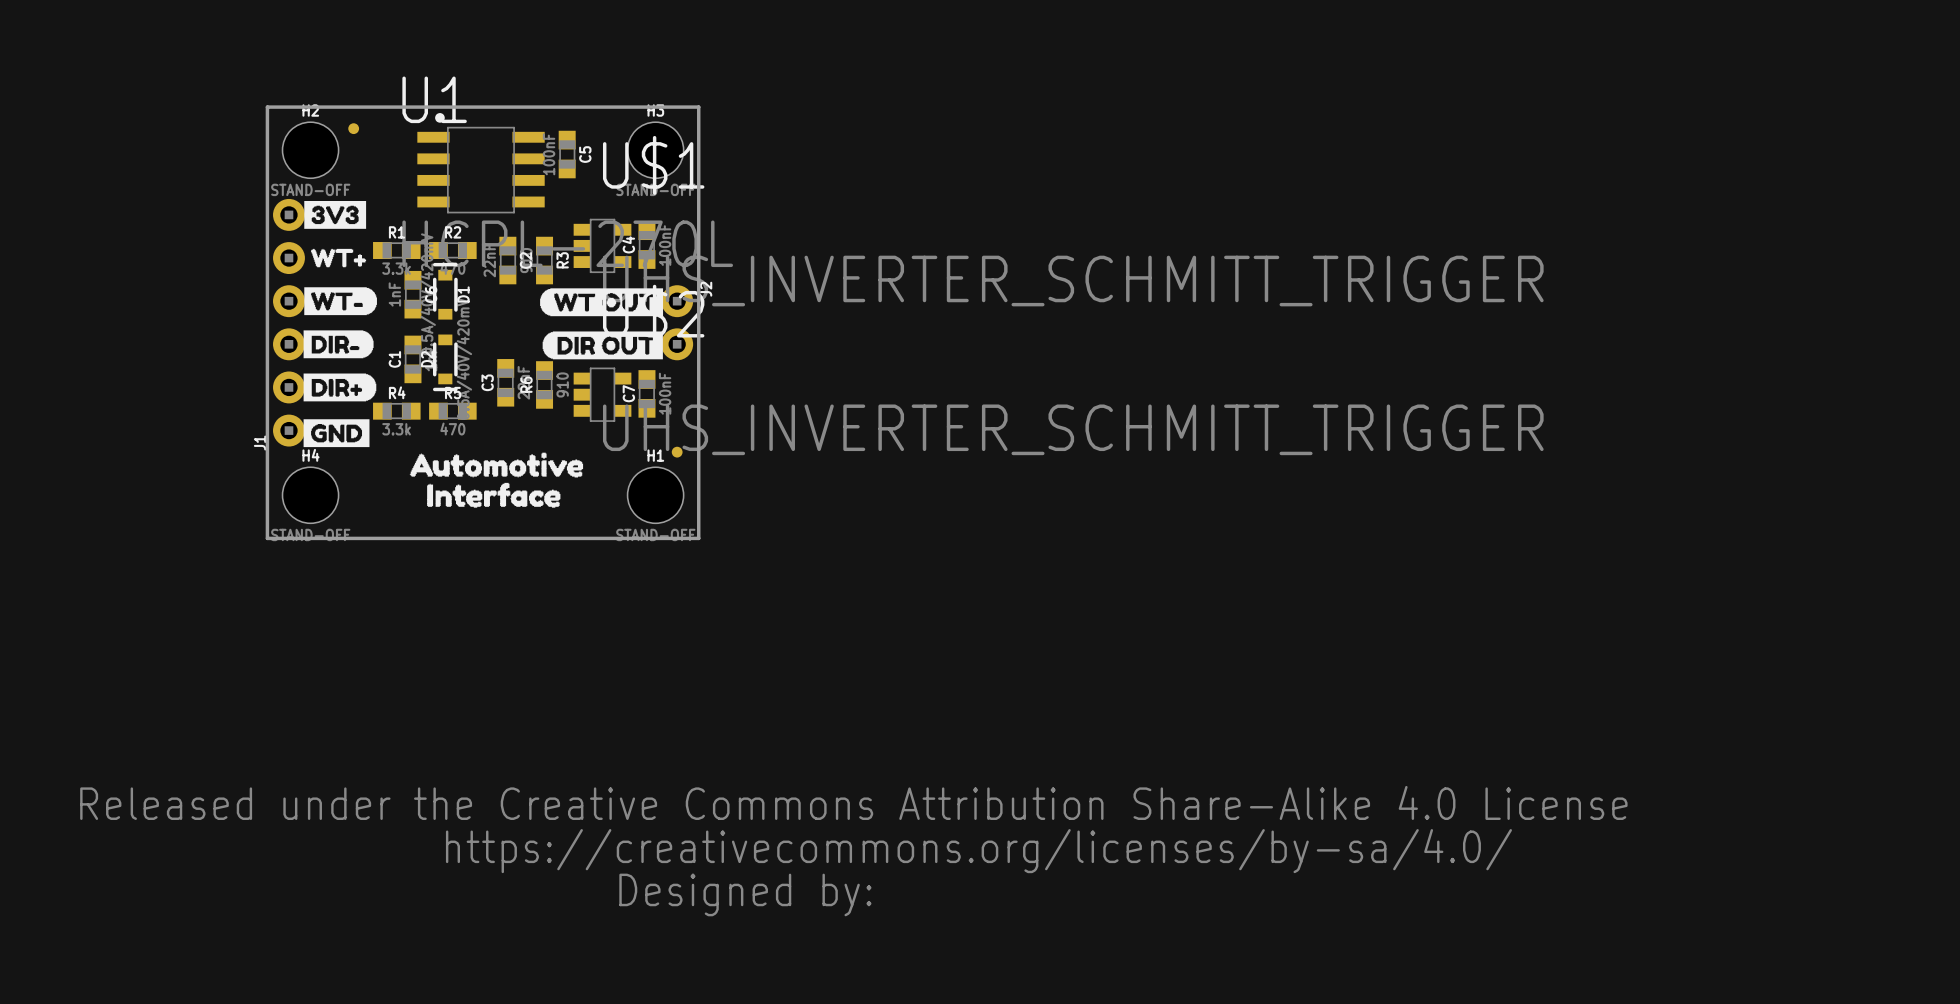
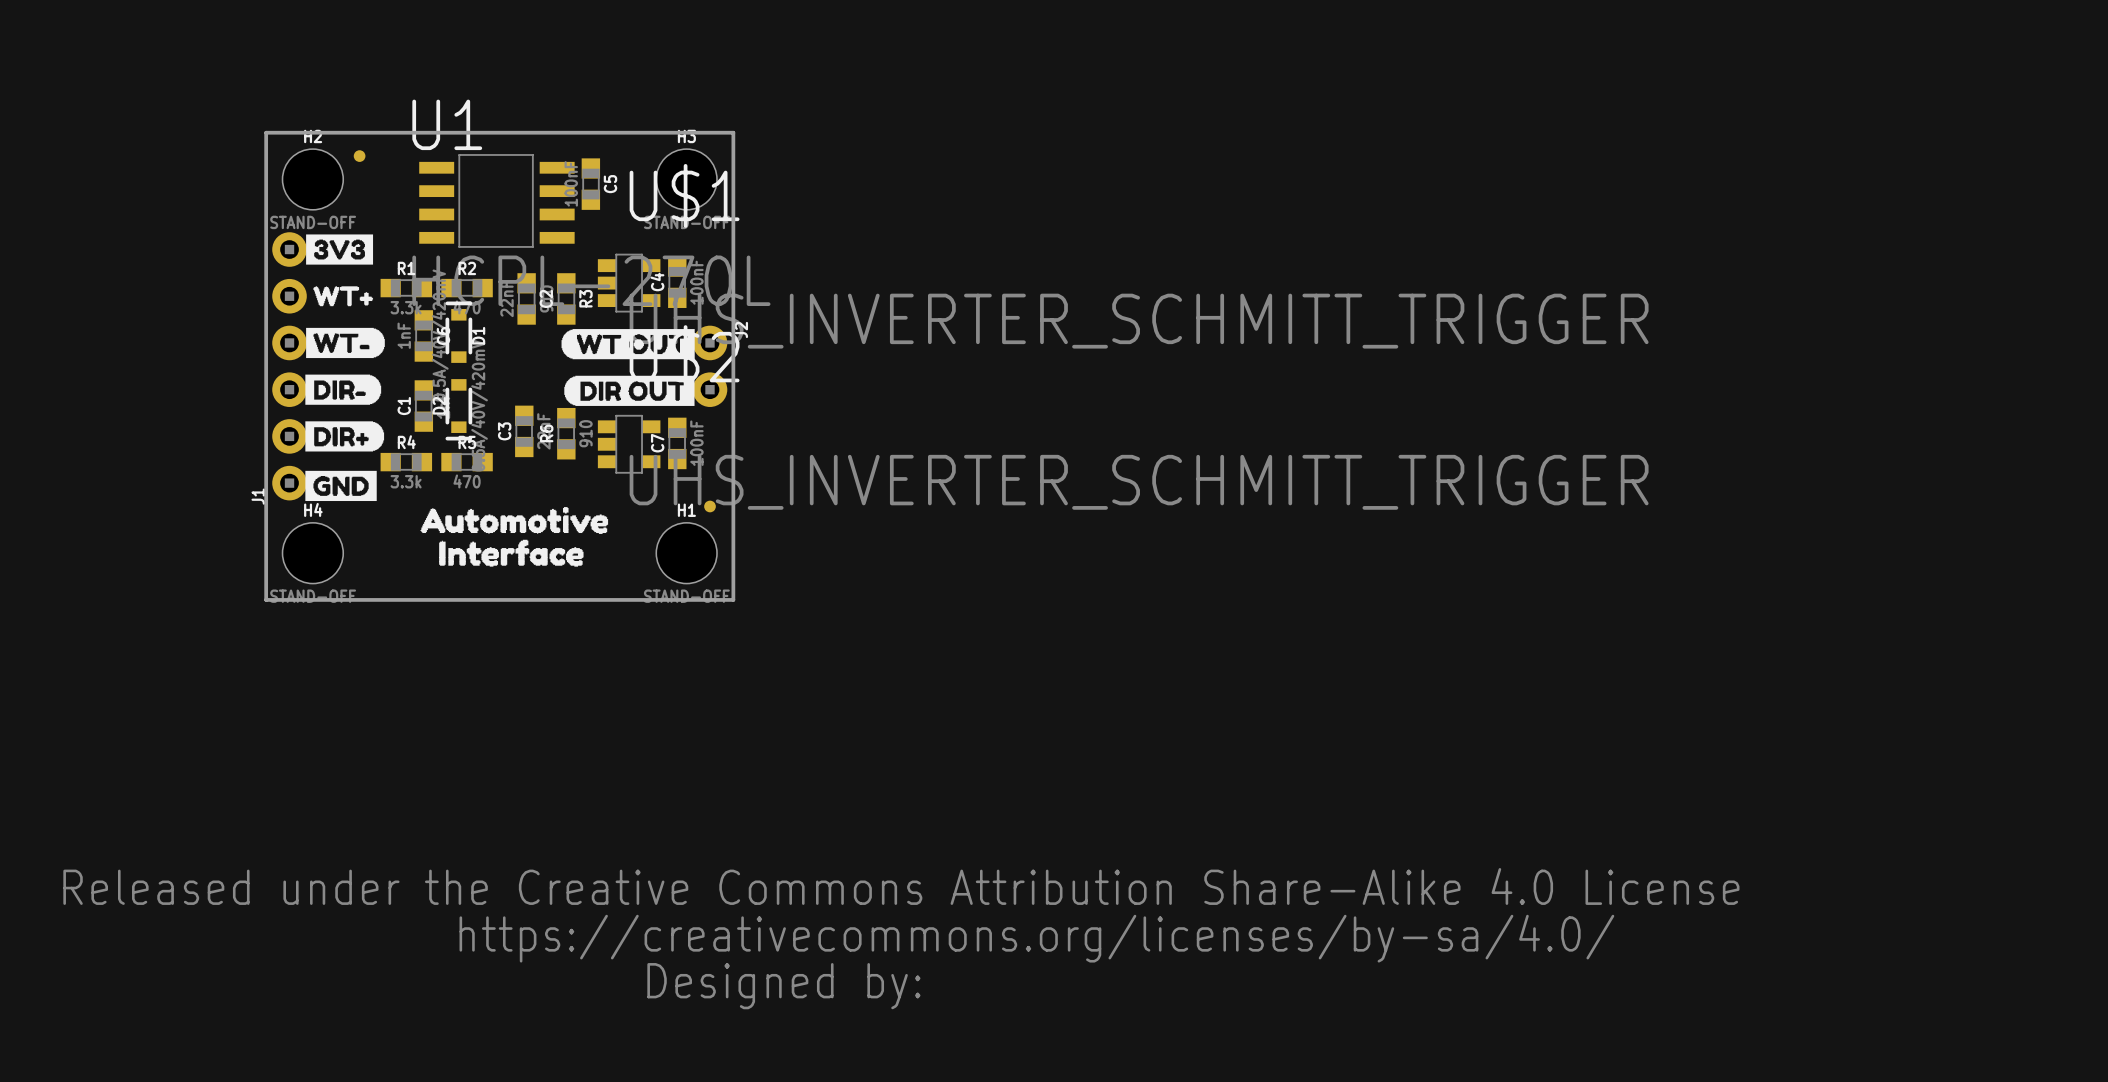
U1 footprint: [417, 113, 545, 214] -> [419, 154, 575, 248]

